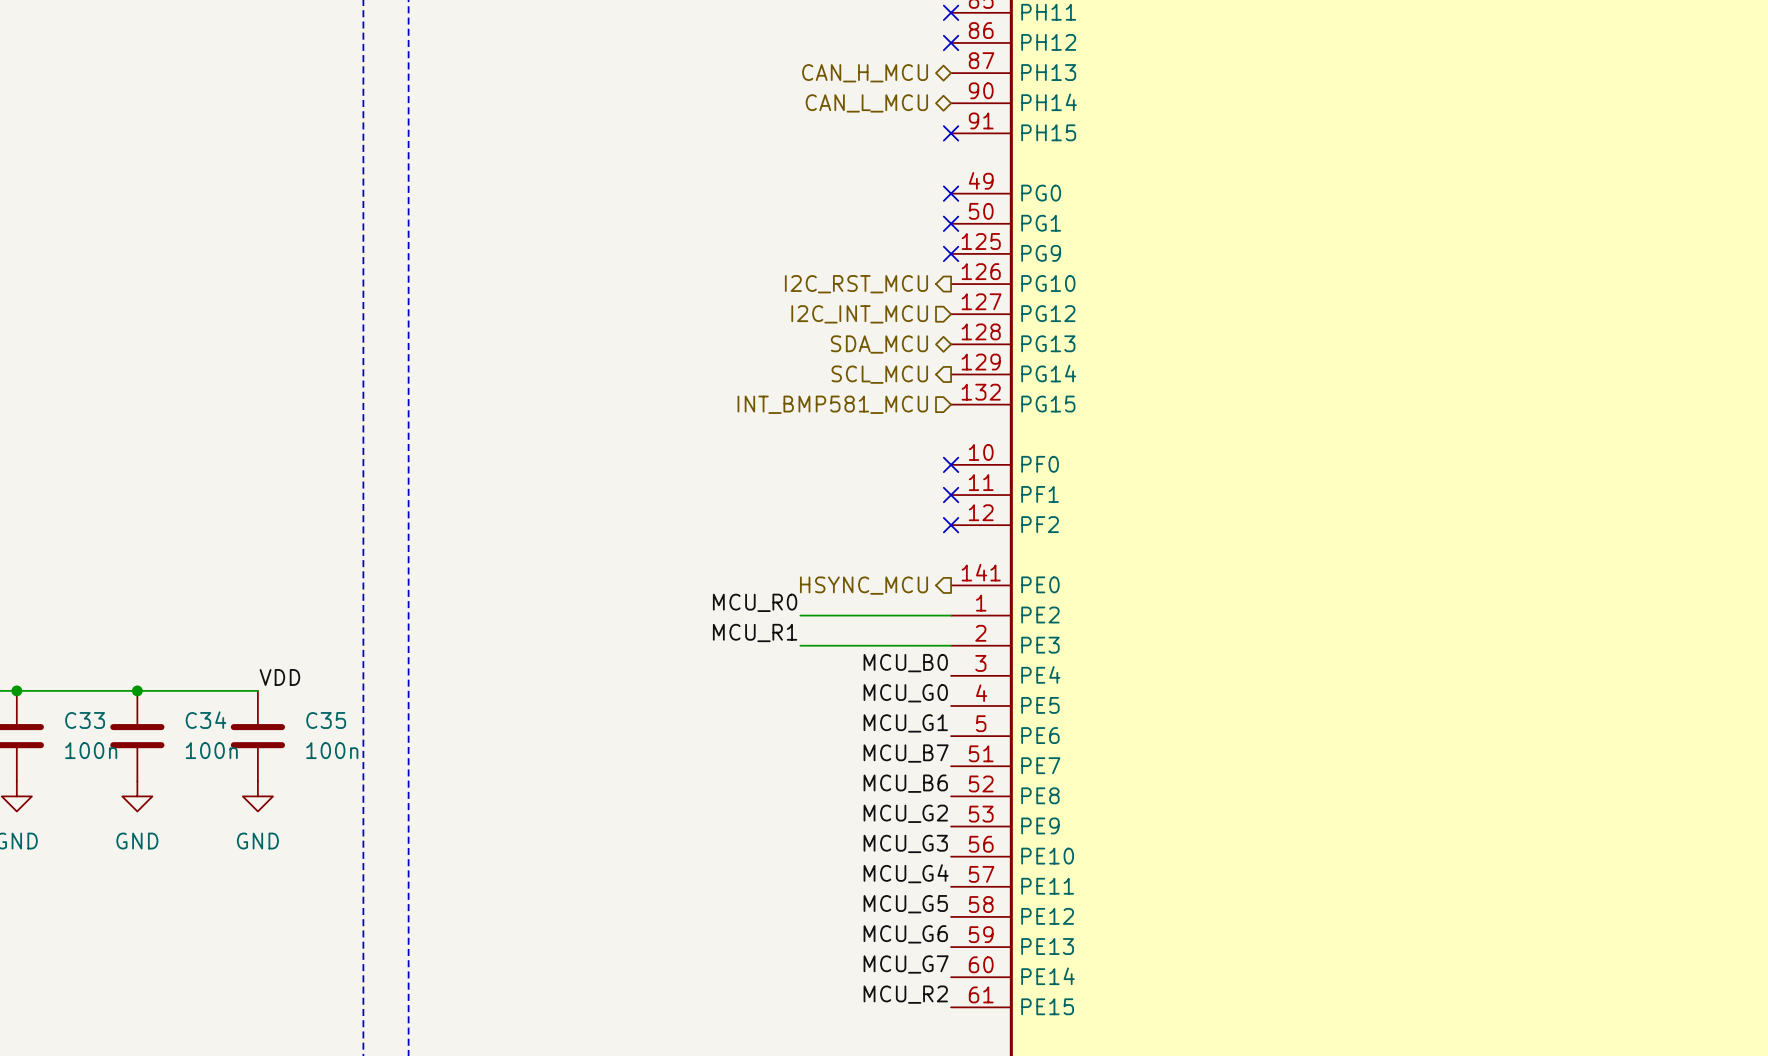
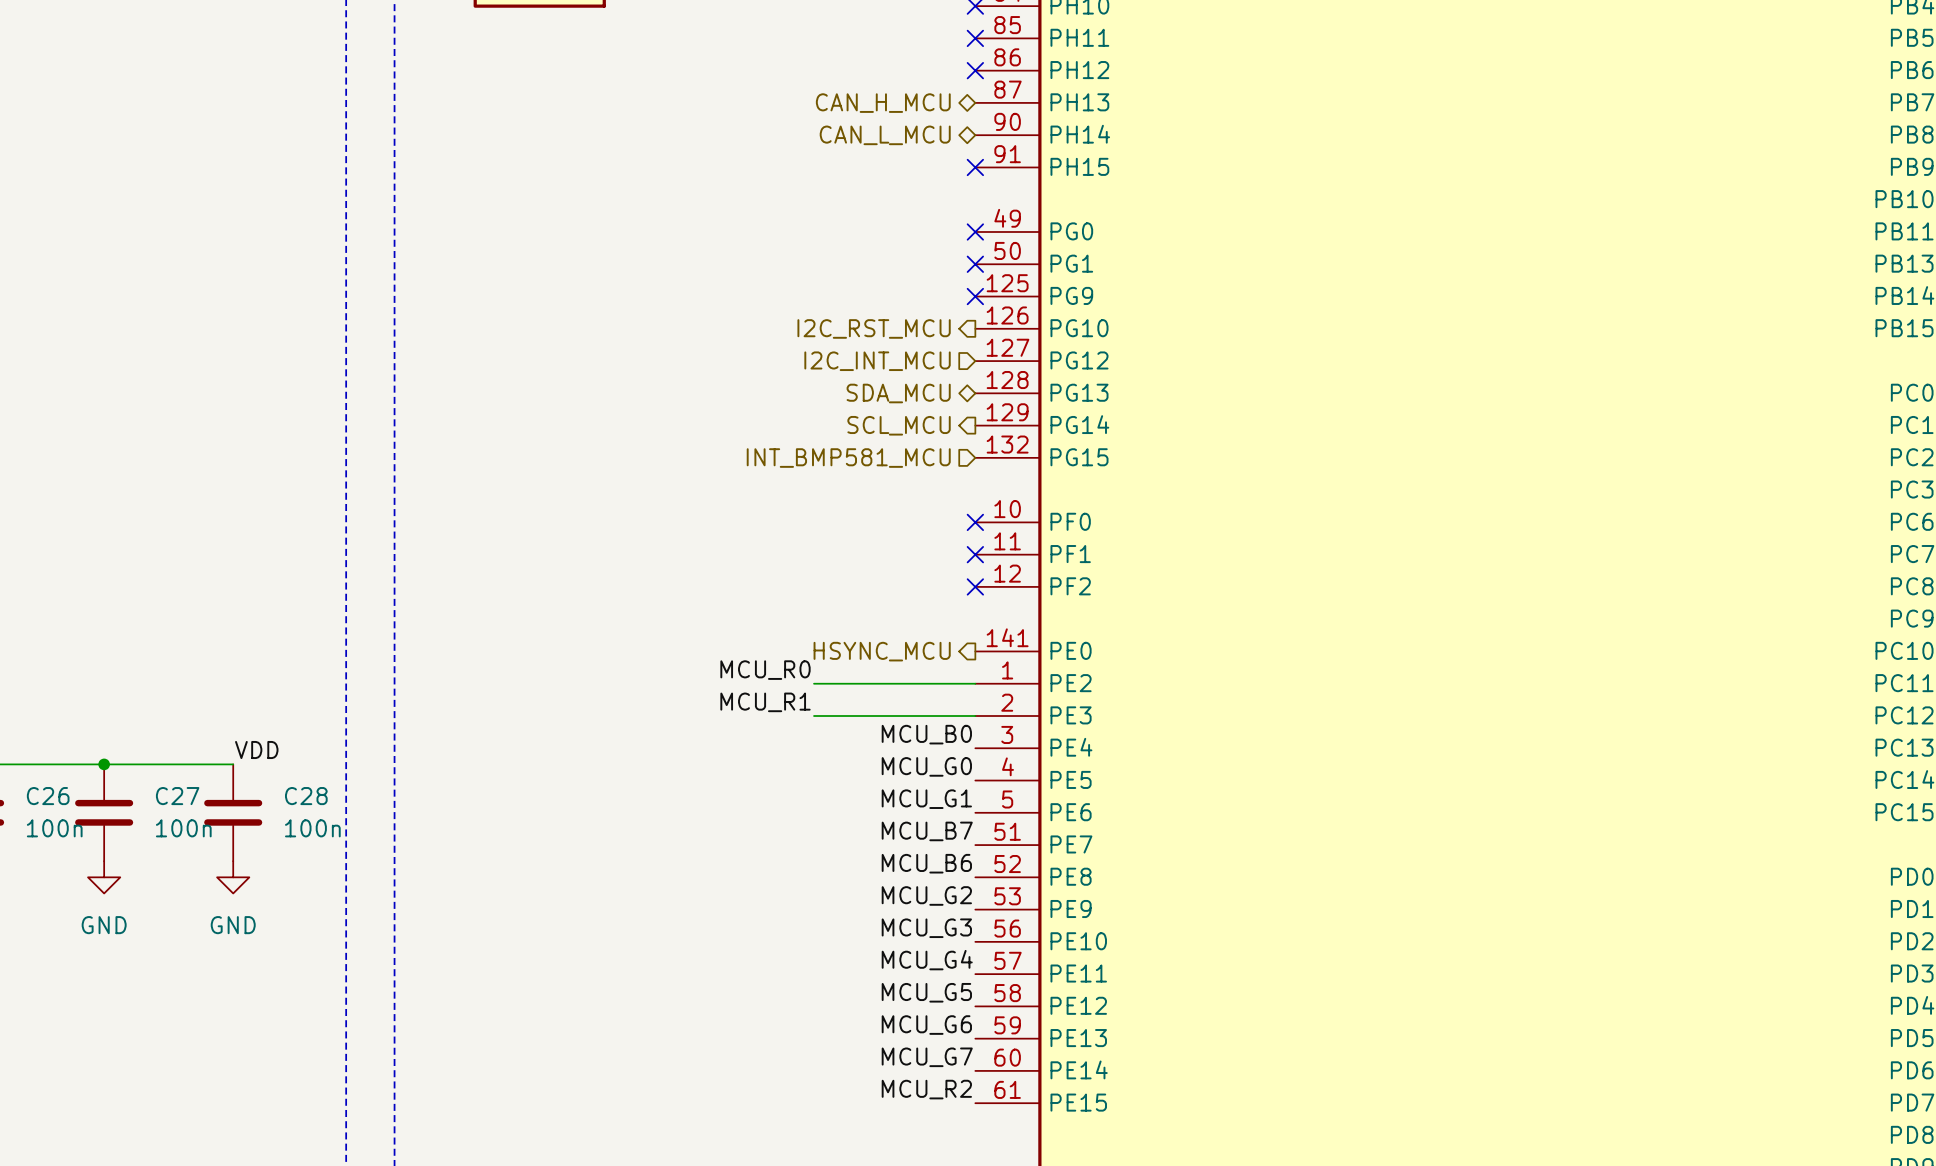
C33 name: C33 (85, 720) -> C26 (48, 796)
C34 name: C34 (206, 720) -> C27 (177, 796)
C35 name: C35 (326, 720) -> C28 (306, 796)

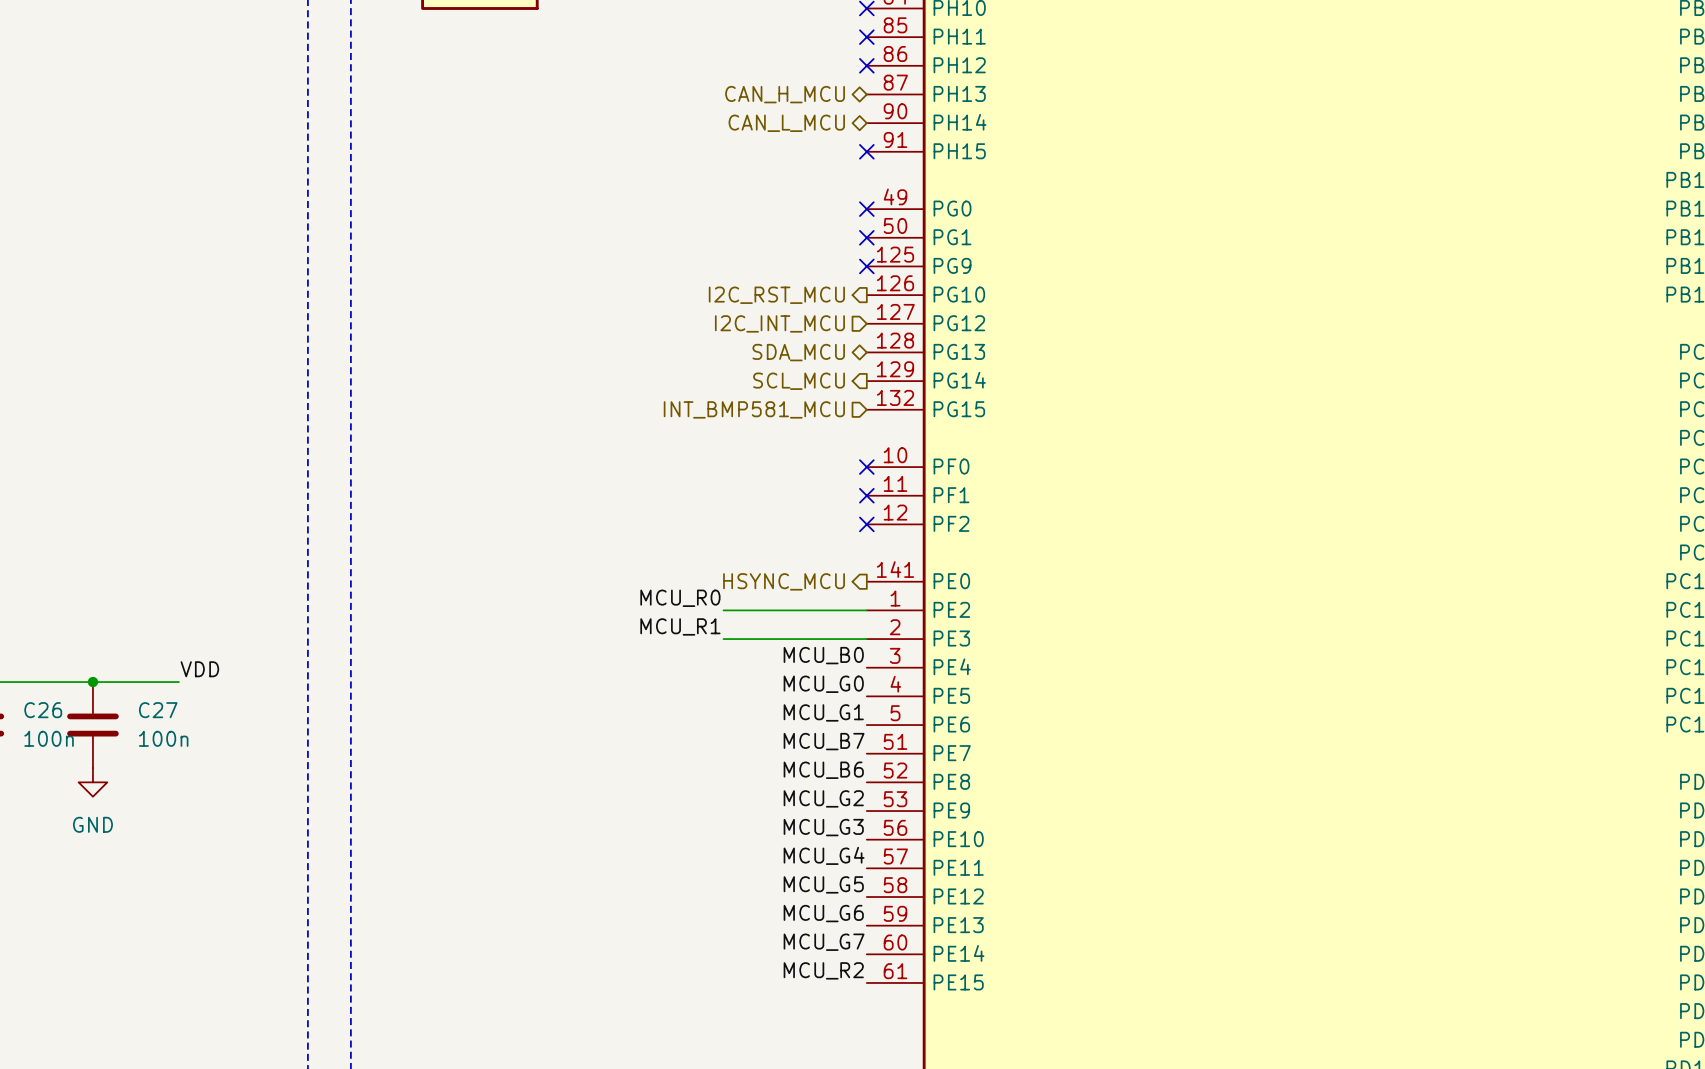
label position: VDD (256, 750) -> VDD (199, 669)
wire: (200, 764) (233, 764) -> none
C28: 100n (233, 812) -> none
power symbol: GND (233, 877) -> none

